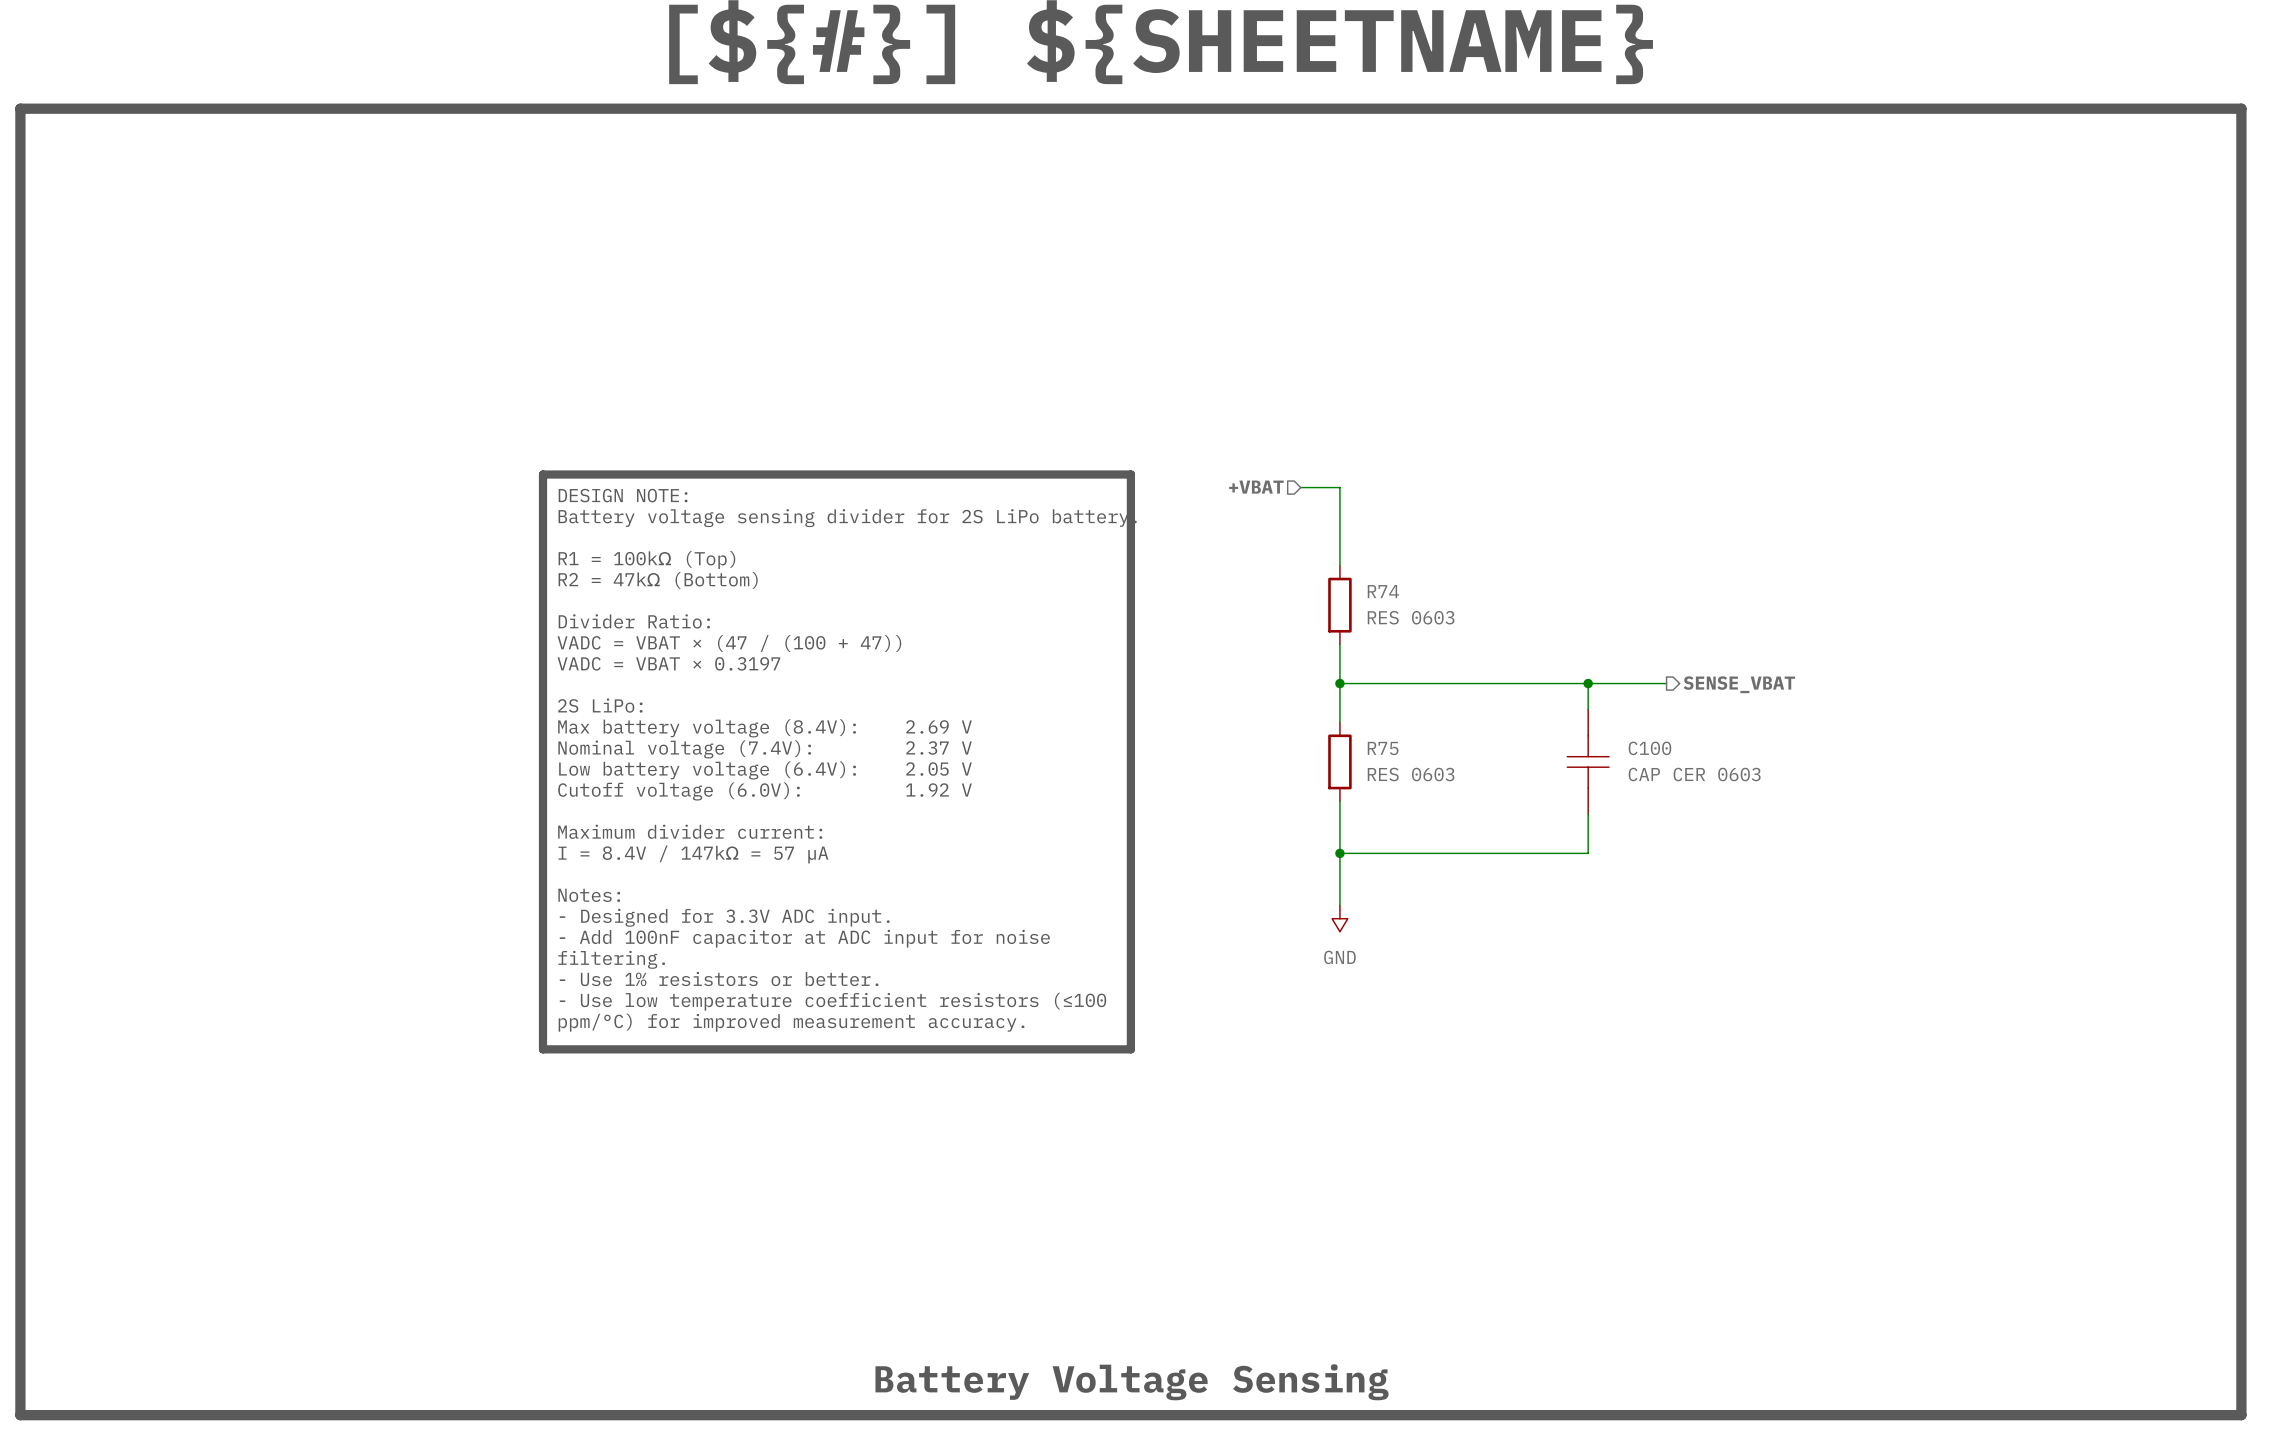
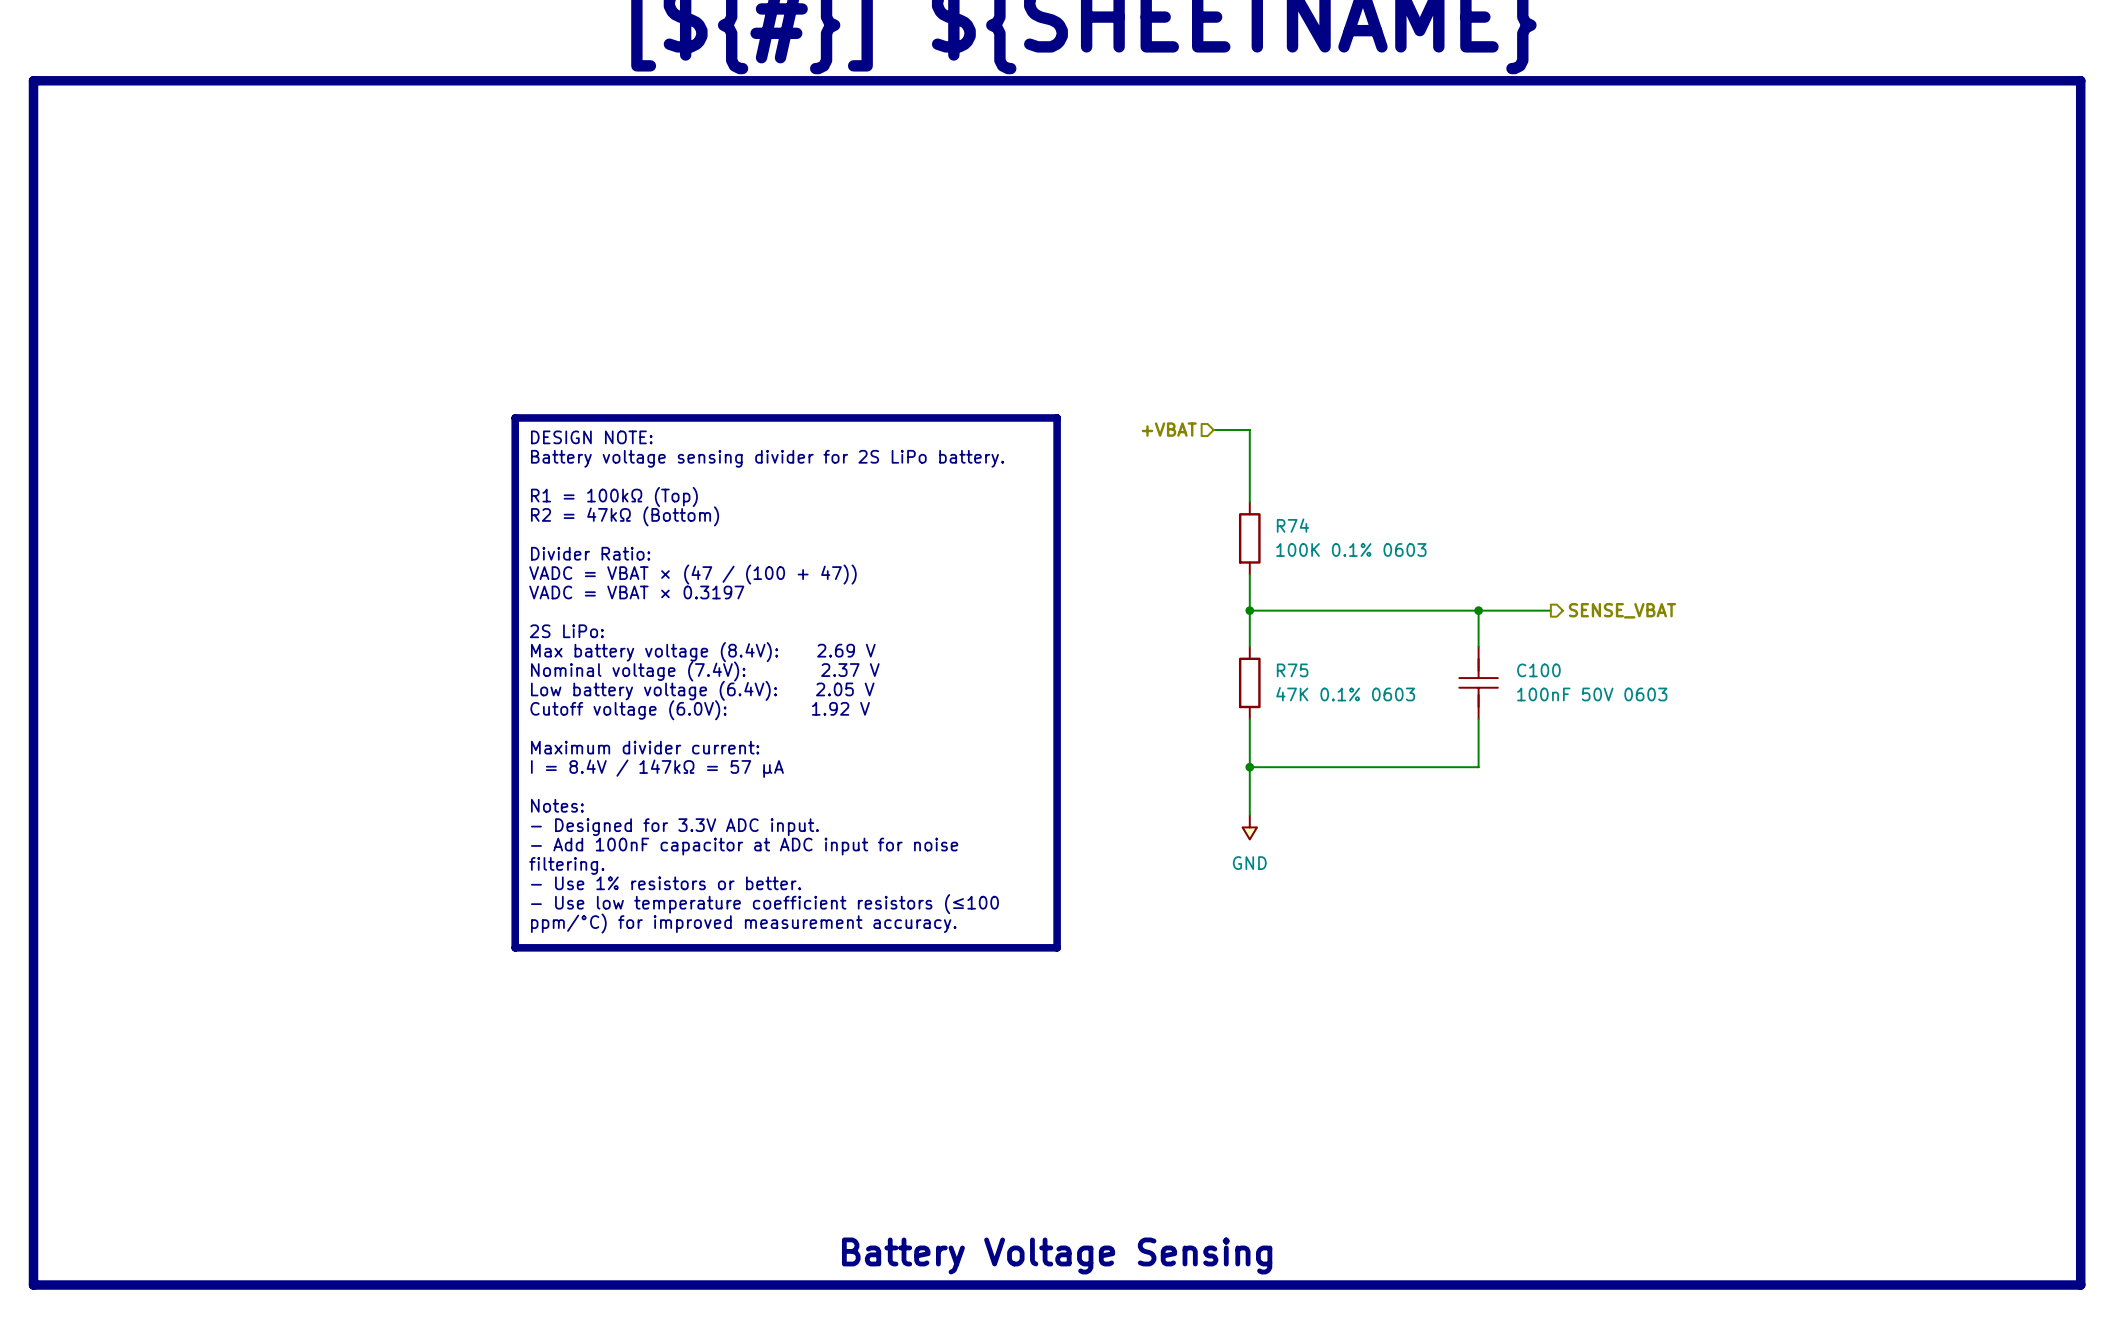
R74 value: RES 0603 (1411, 617) -> 100K 0.1% 0603 (1351, 549)
C100 symbol: [1567, 709, 1610, 815] -> [1459, 646, 1498, 720]
R75 value: RES 0603 (1411, 774) -> 47K 0.1% 0603 (1345, 694)
C100 value: CAP CER 0603 (1694, 774) -> 100nF 50V 0603 (1592, 694)

